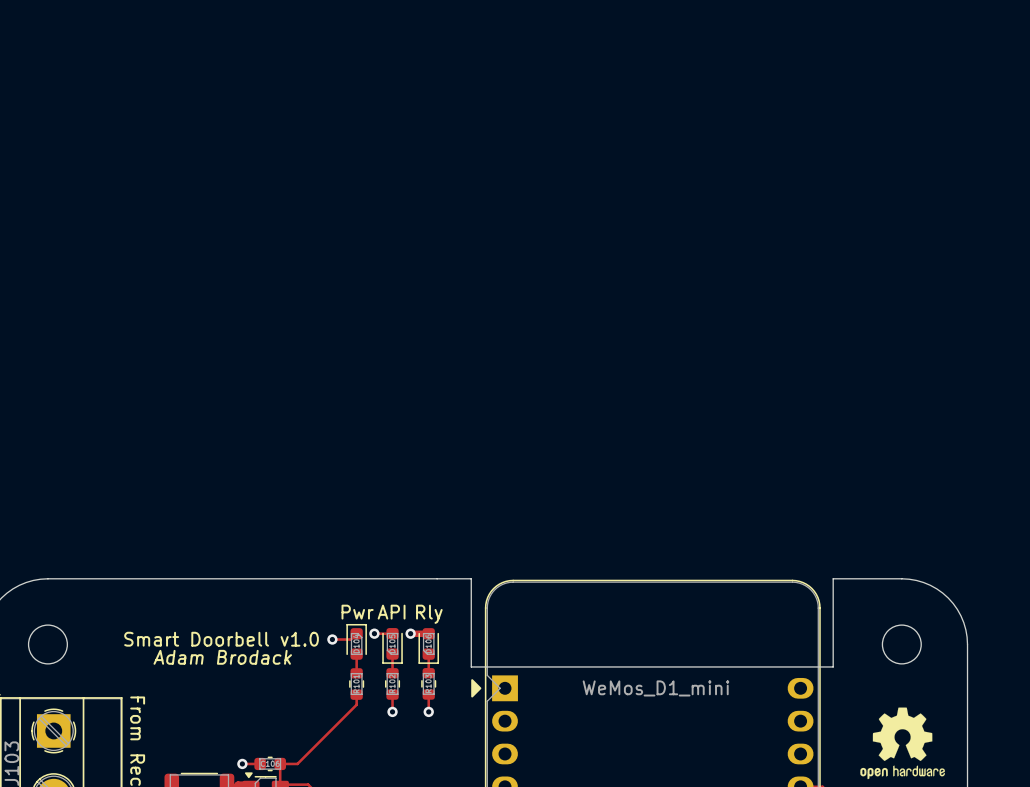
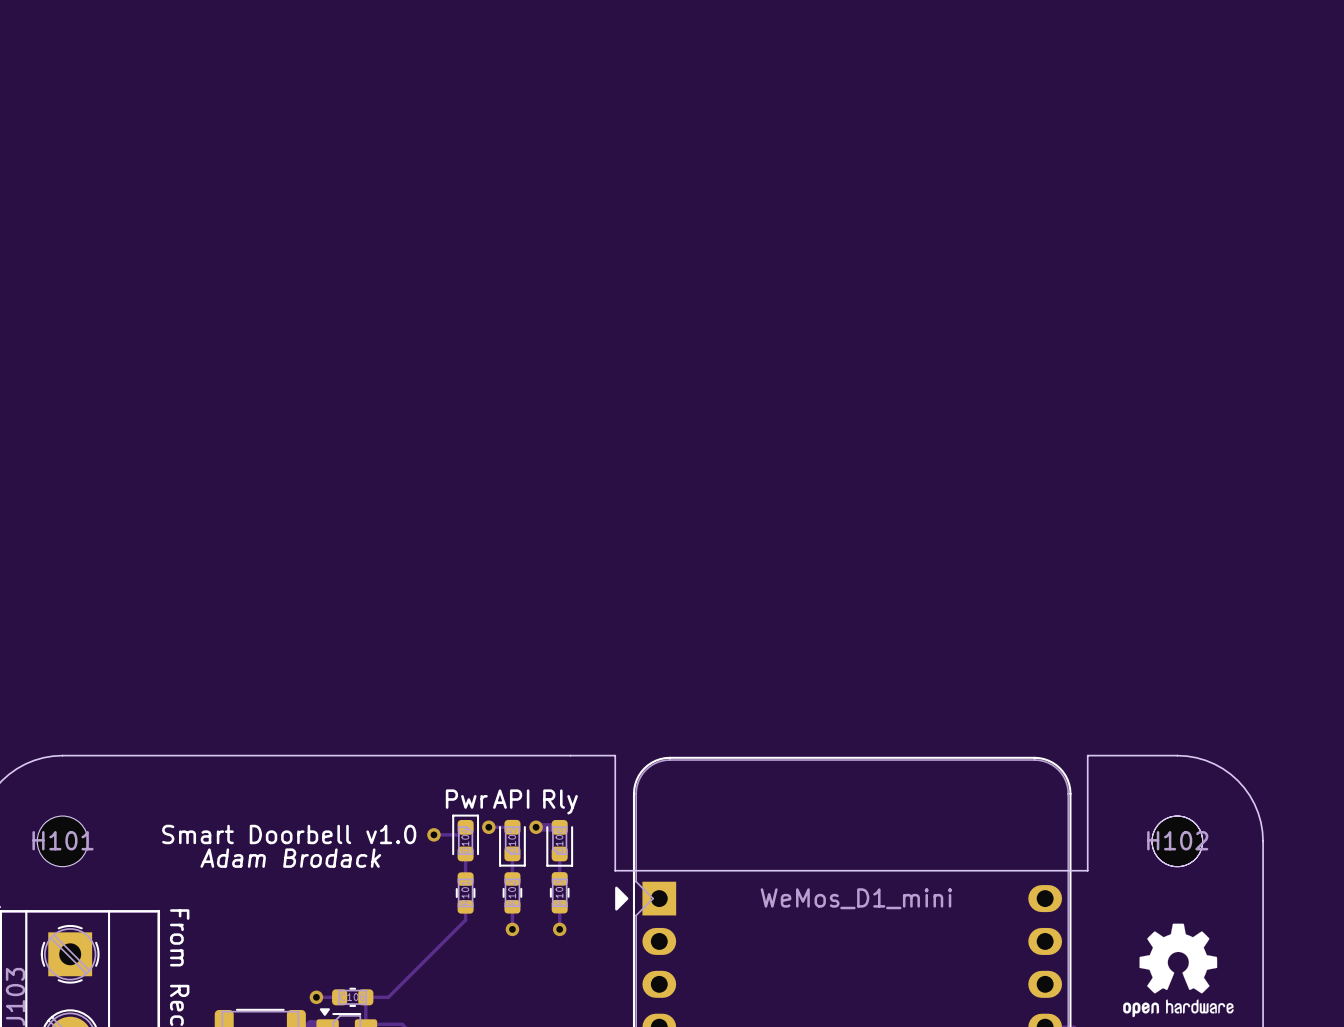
H101 name: none -> H101 (63, 840)
H102: none -> (1177, 841)

